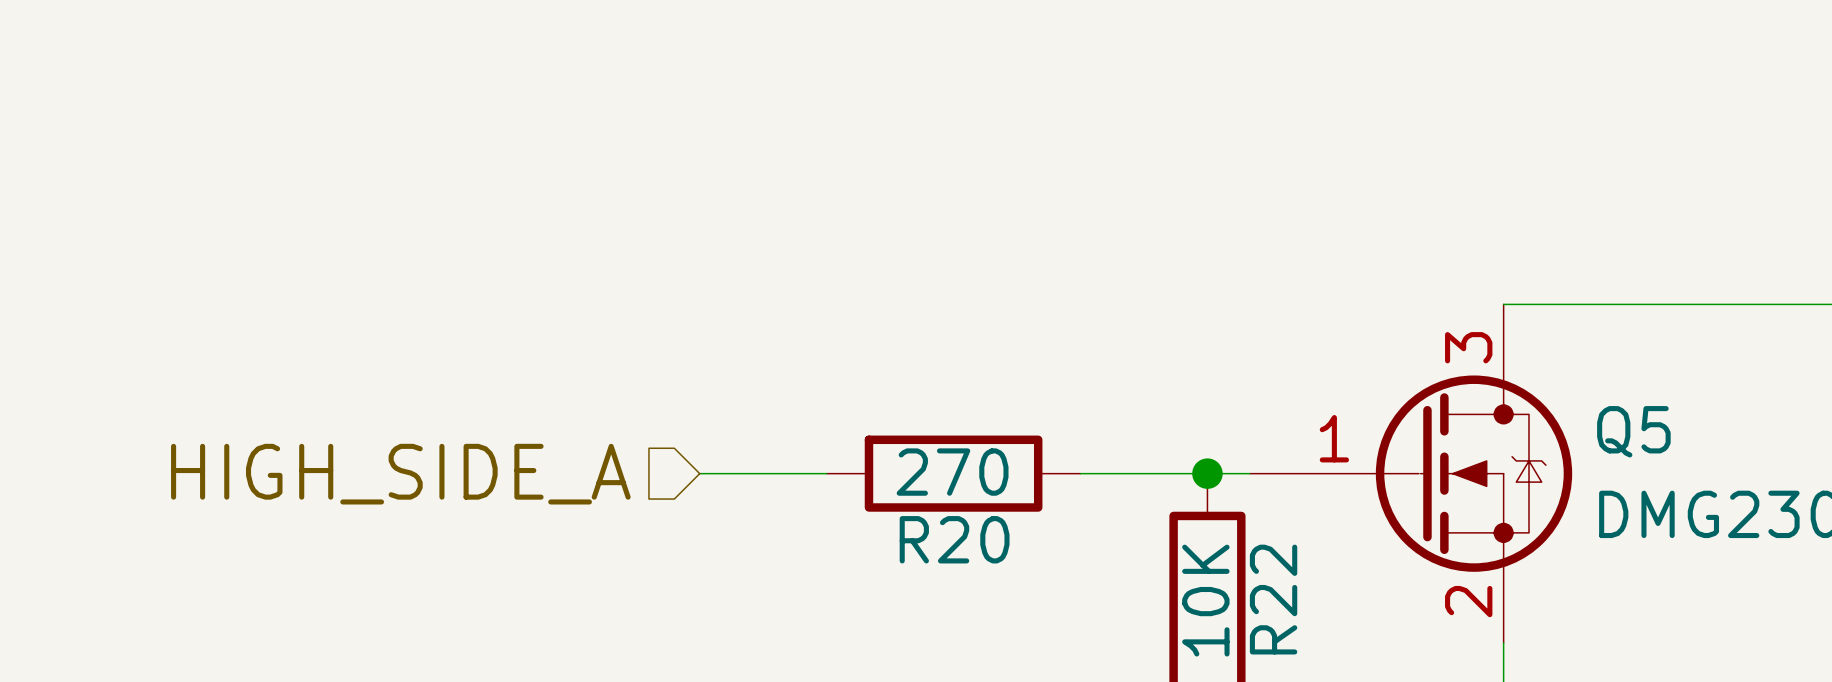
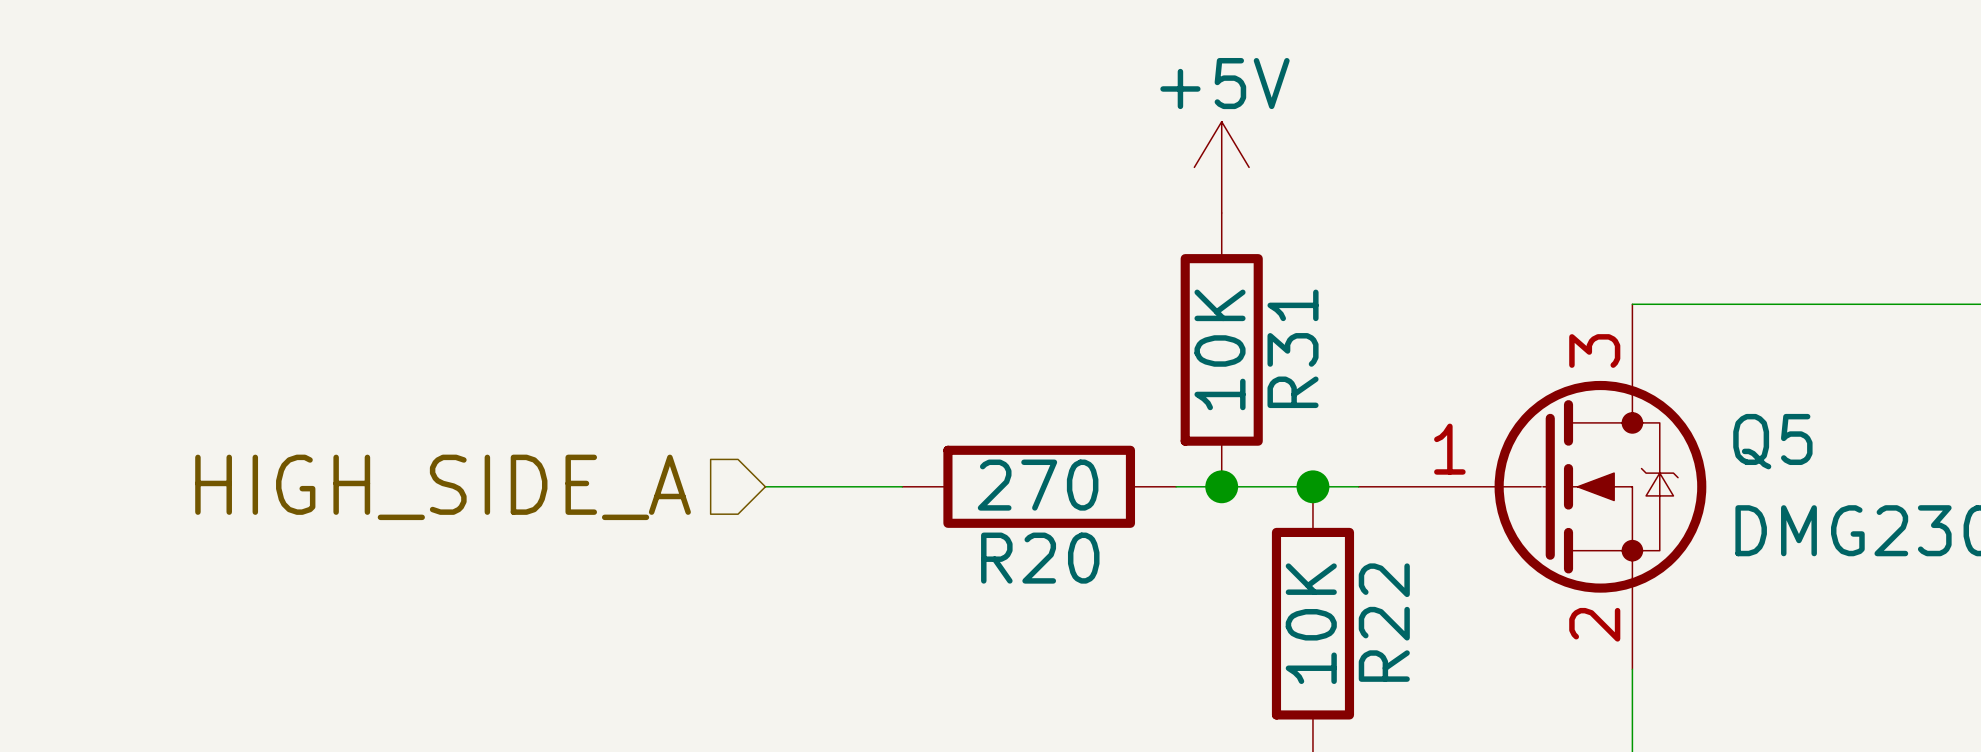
power symbol: none -> +5V (1221, 167)
R31: none -> 10K (1221, 349)
junction: none -> (1221, 486)

